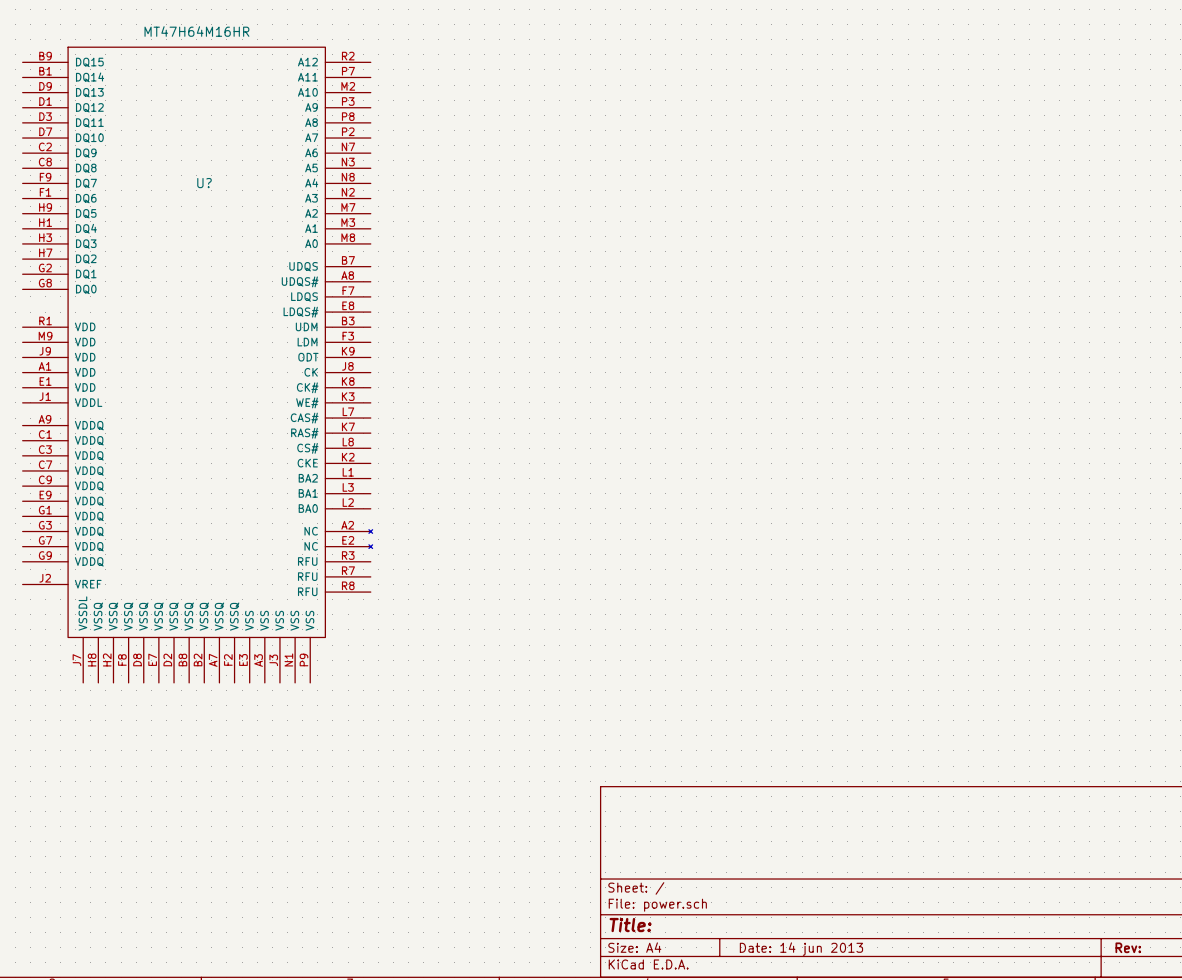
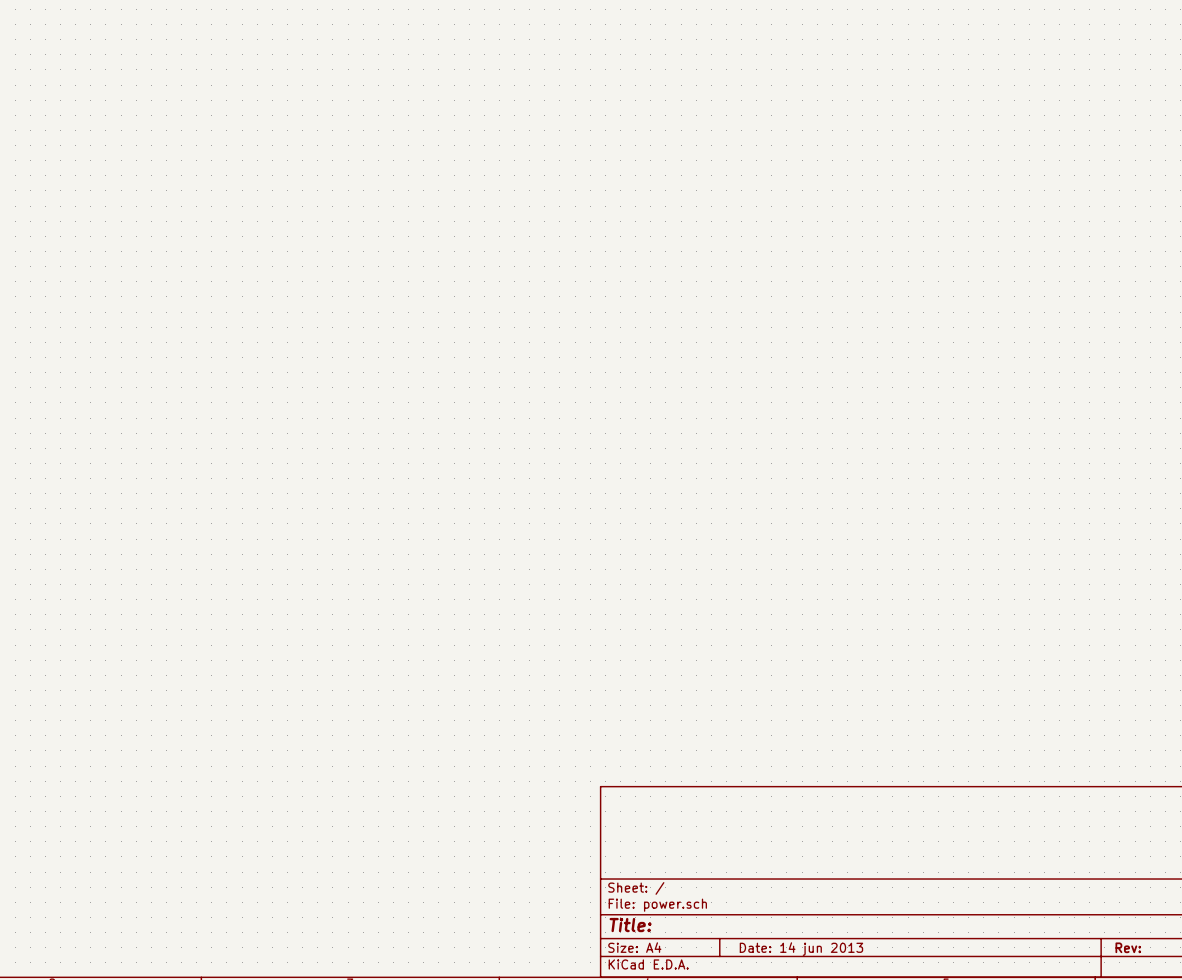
U?: MT47H64M16HR (197, 365) -> none

